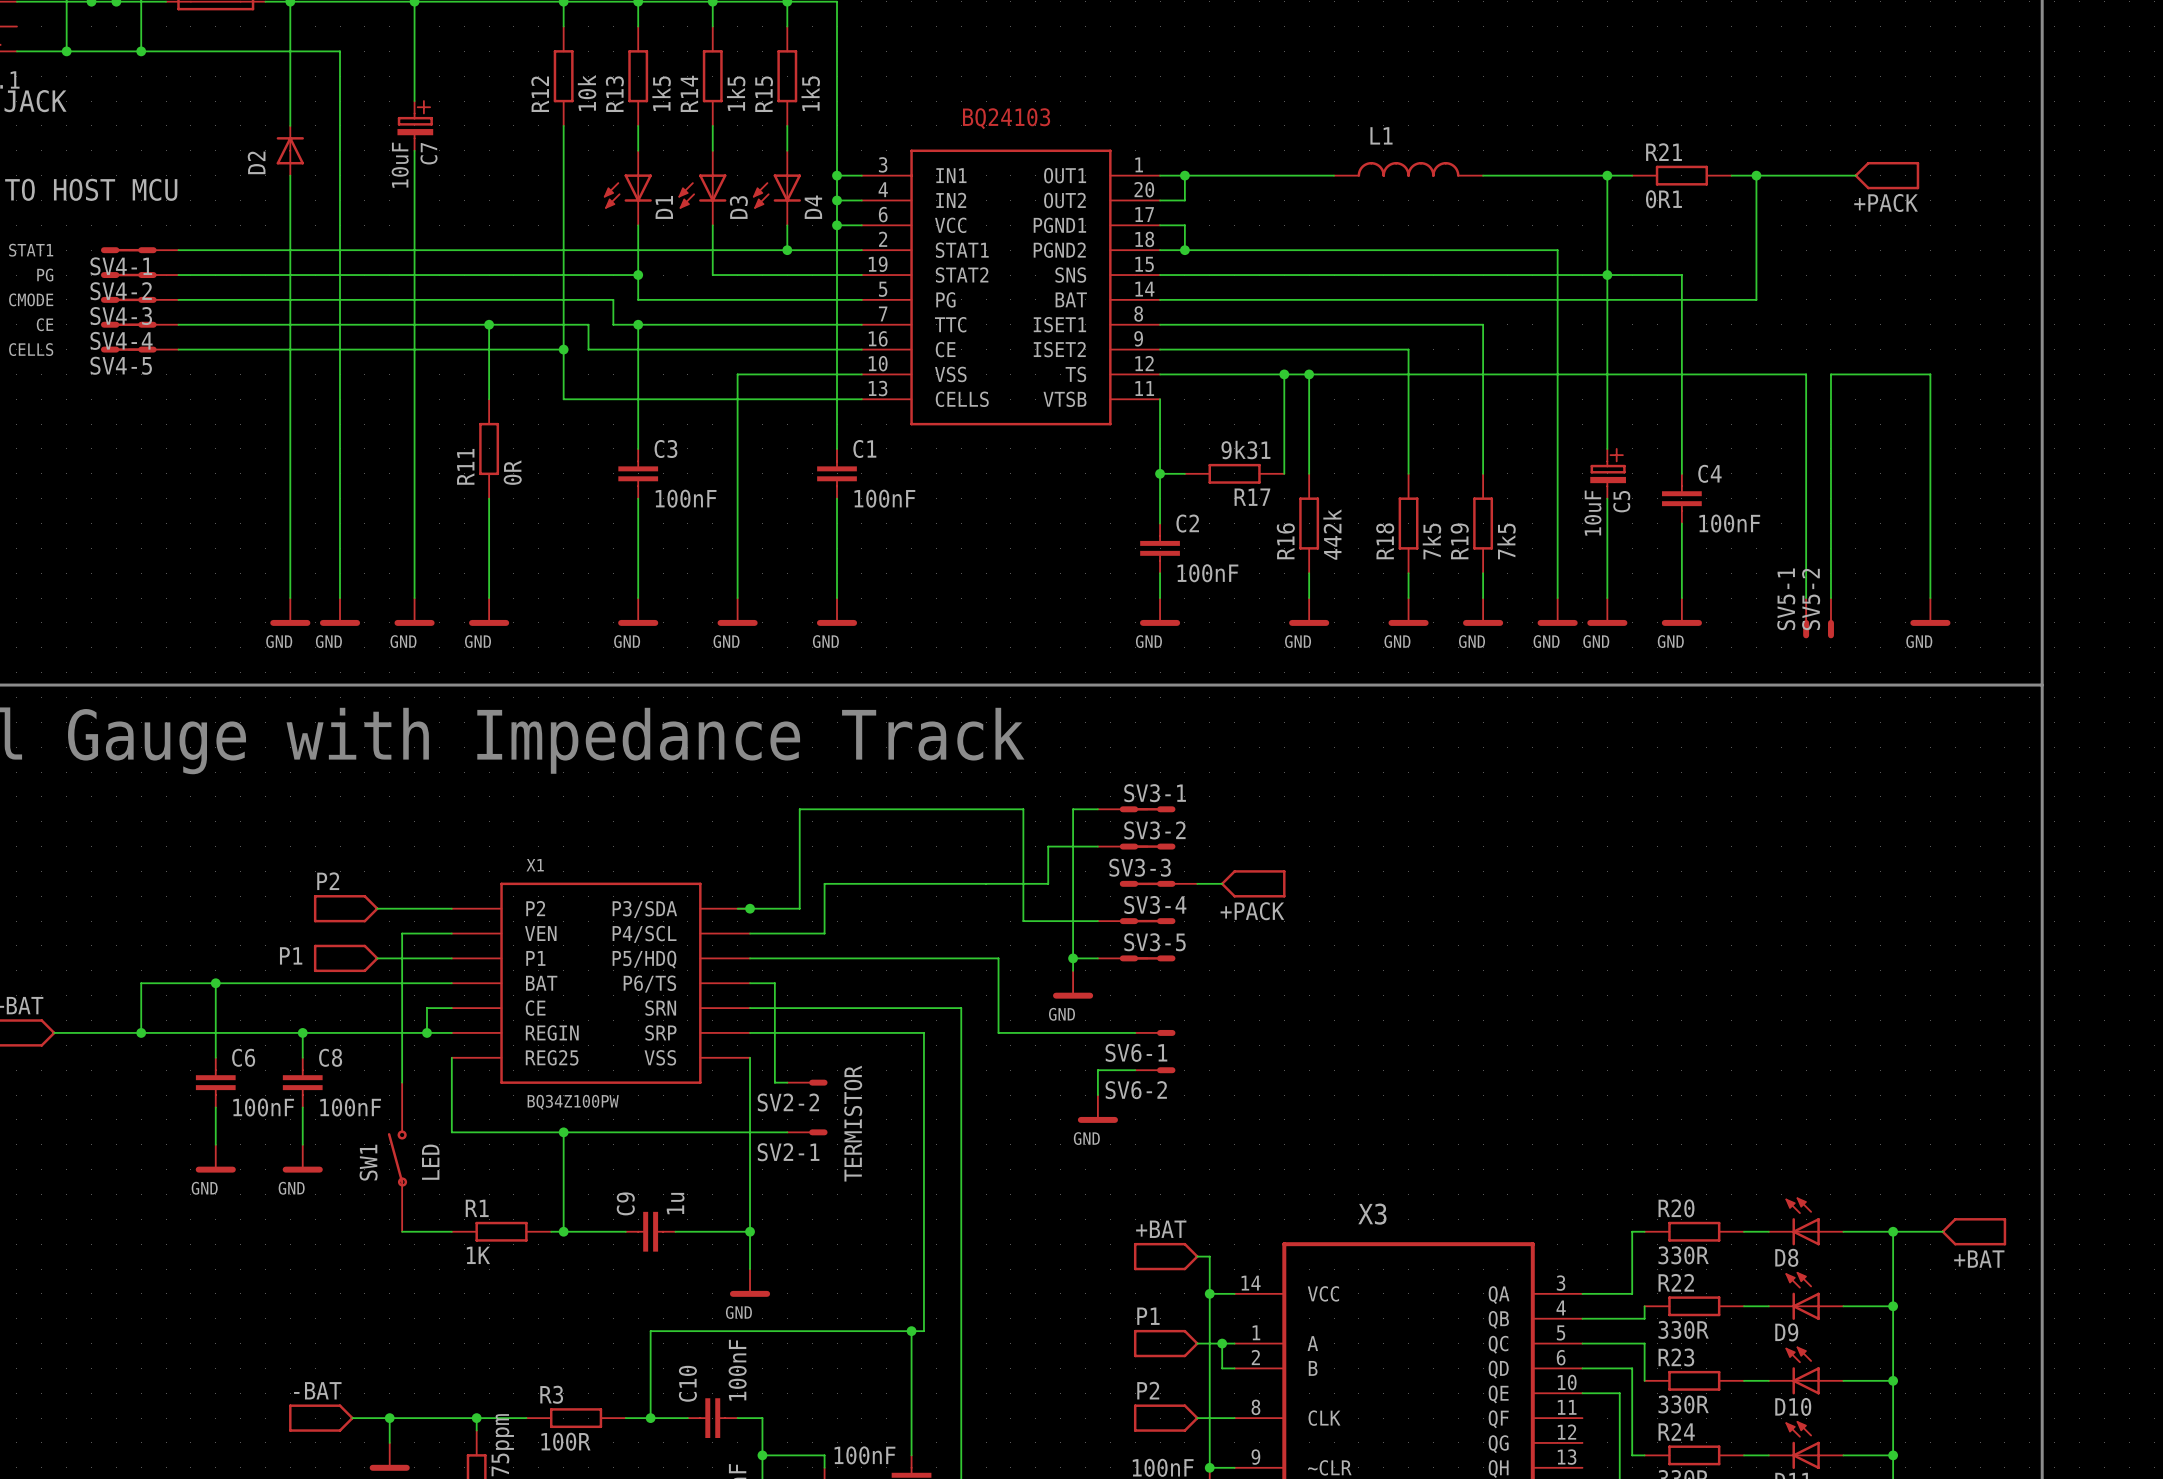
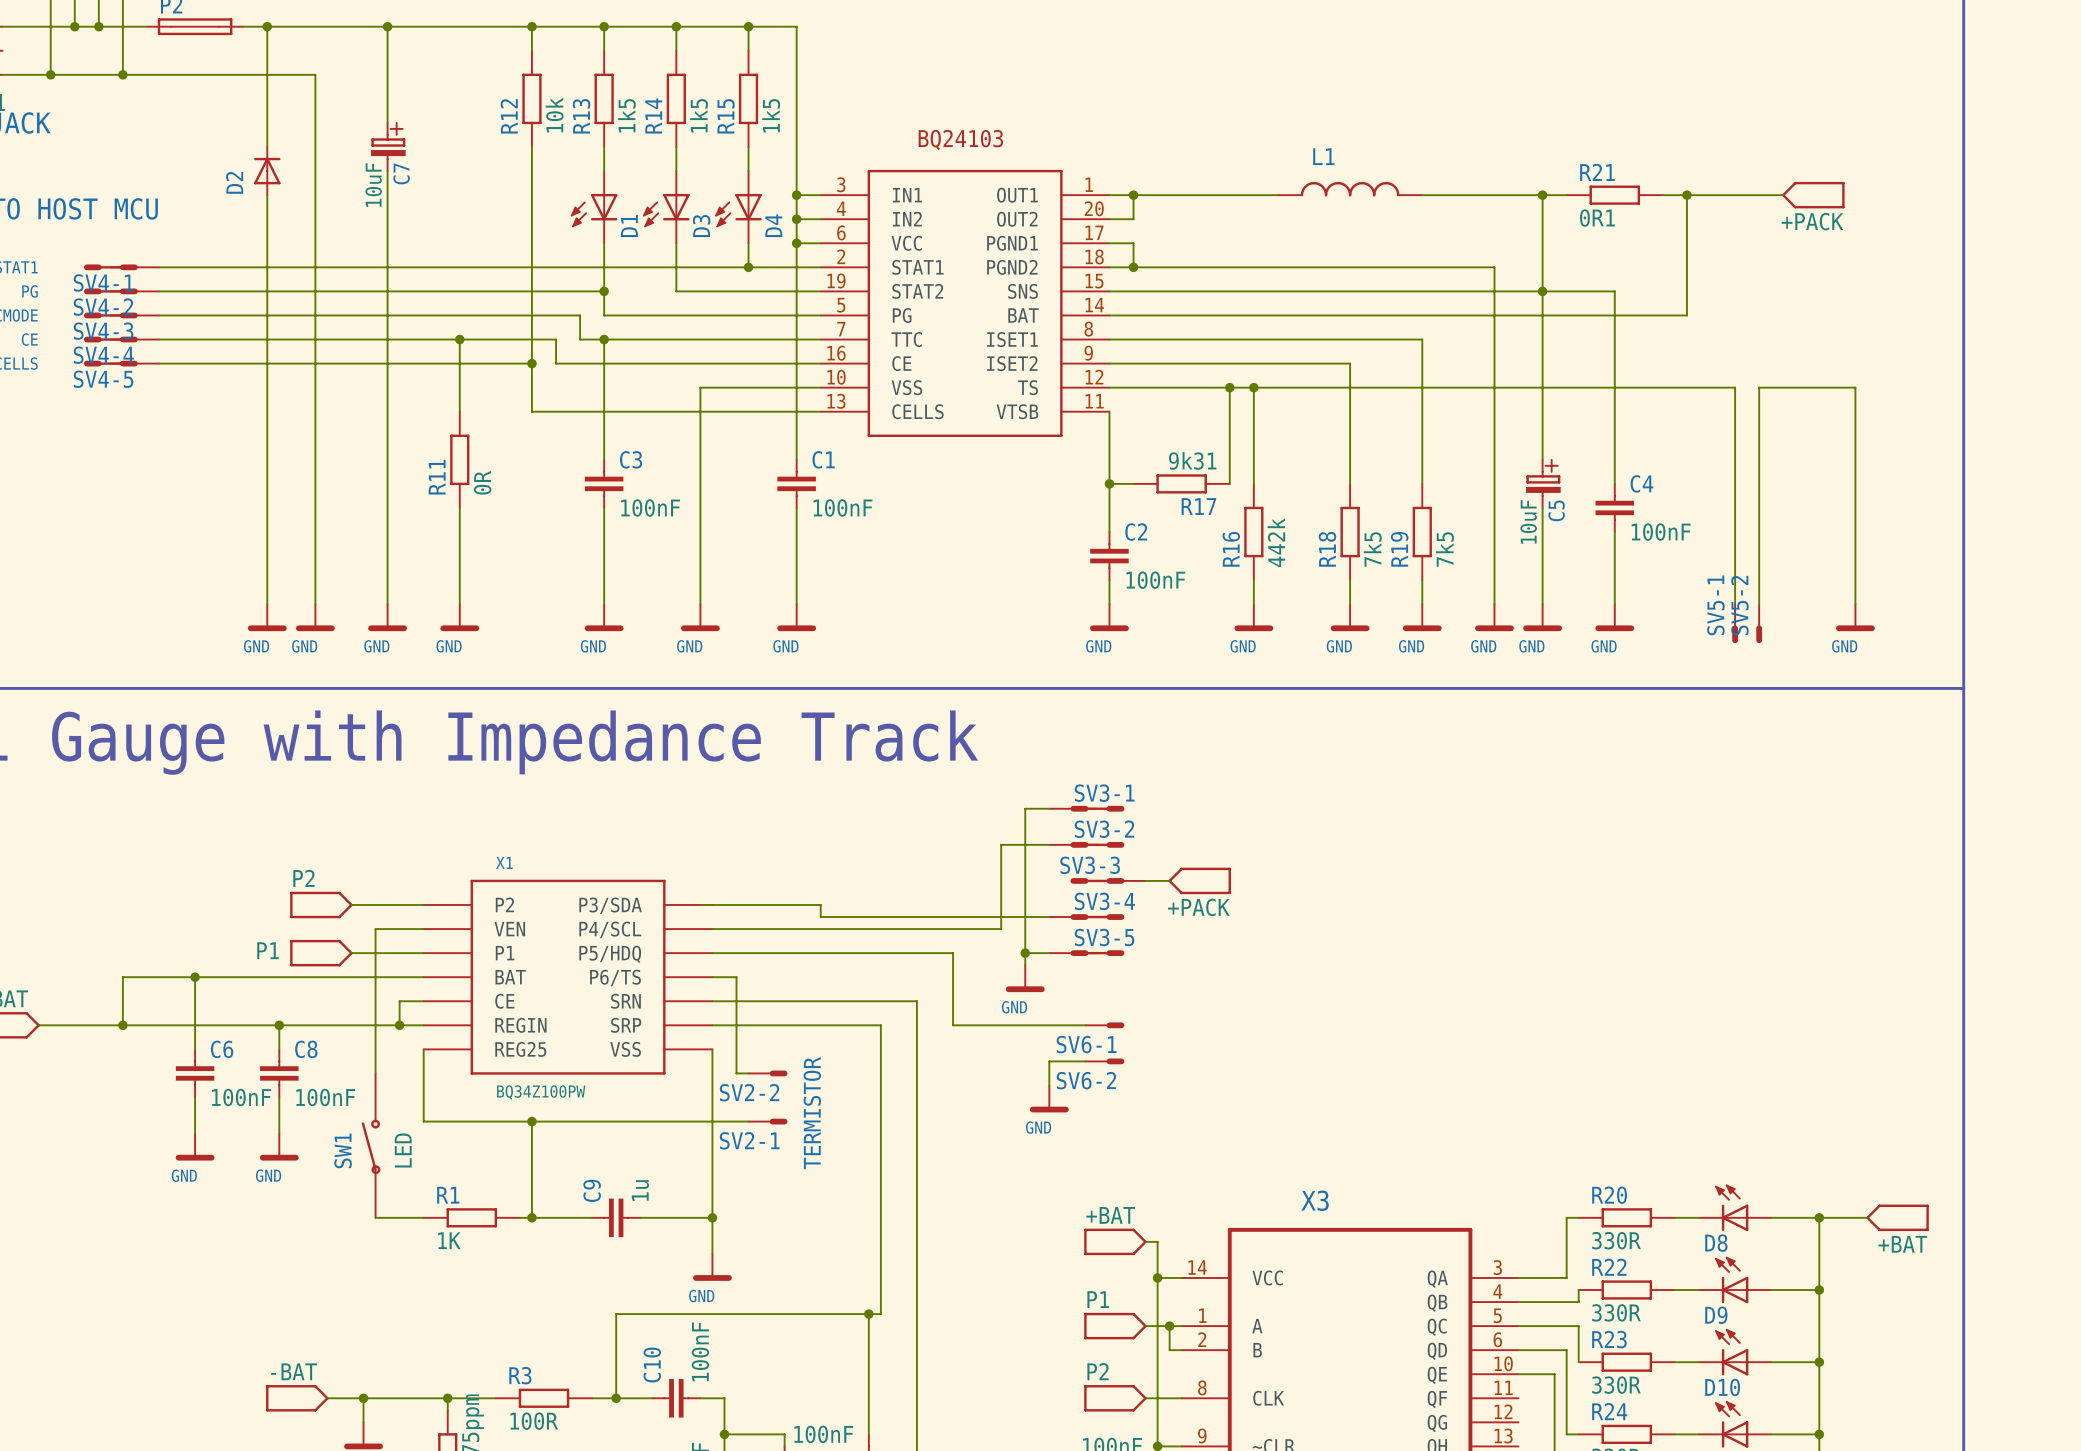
wire: (1048, 883) (824, 883) (824, 933) -> (1001, 880) (1001, 929) (784, 929)
junction: (750, 908) -> none
wire: (799, 908) (799, 809) (1023, 809) (1023, 921) -> (760, 905) (820, 905) (820, 917) (977, 917)

